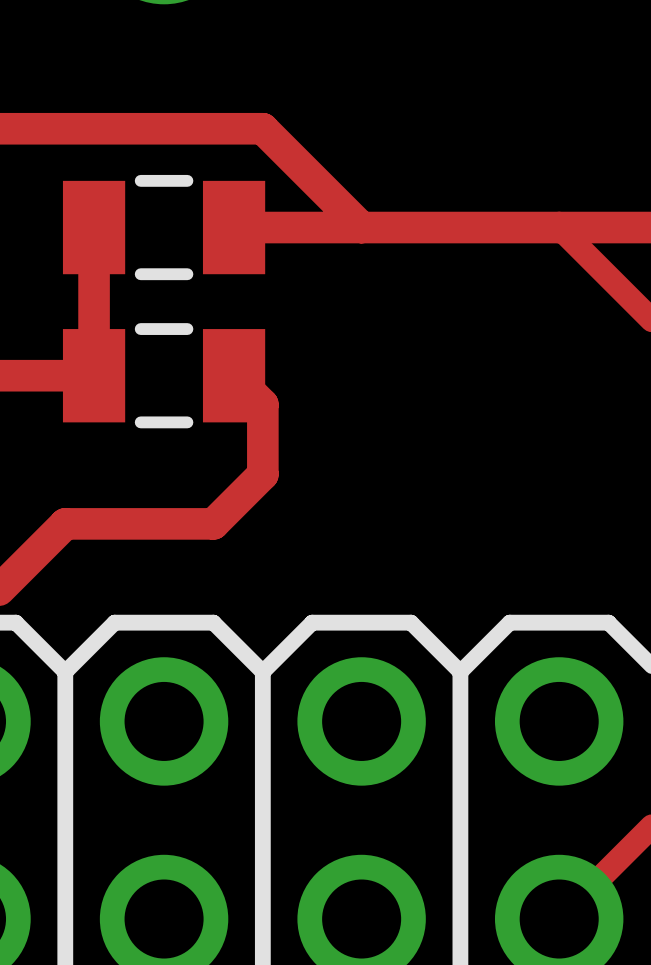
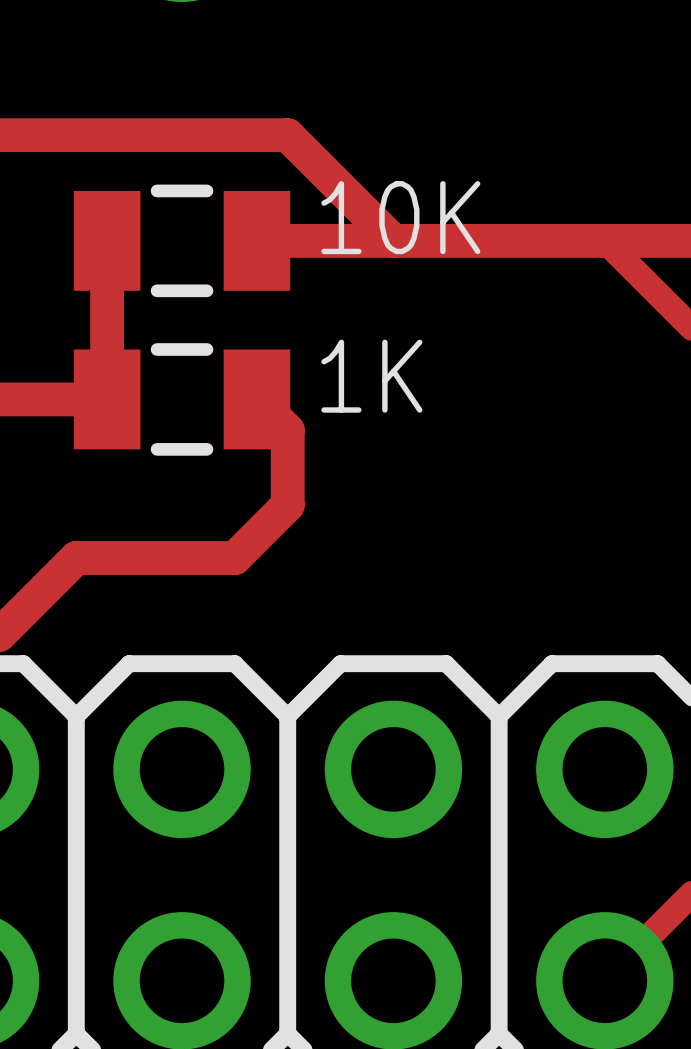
part value: none -> 10K (400, 217)
part value: none -> 1K (371, 376)

